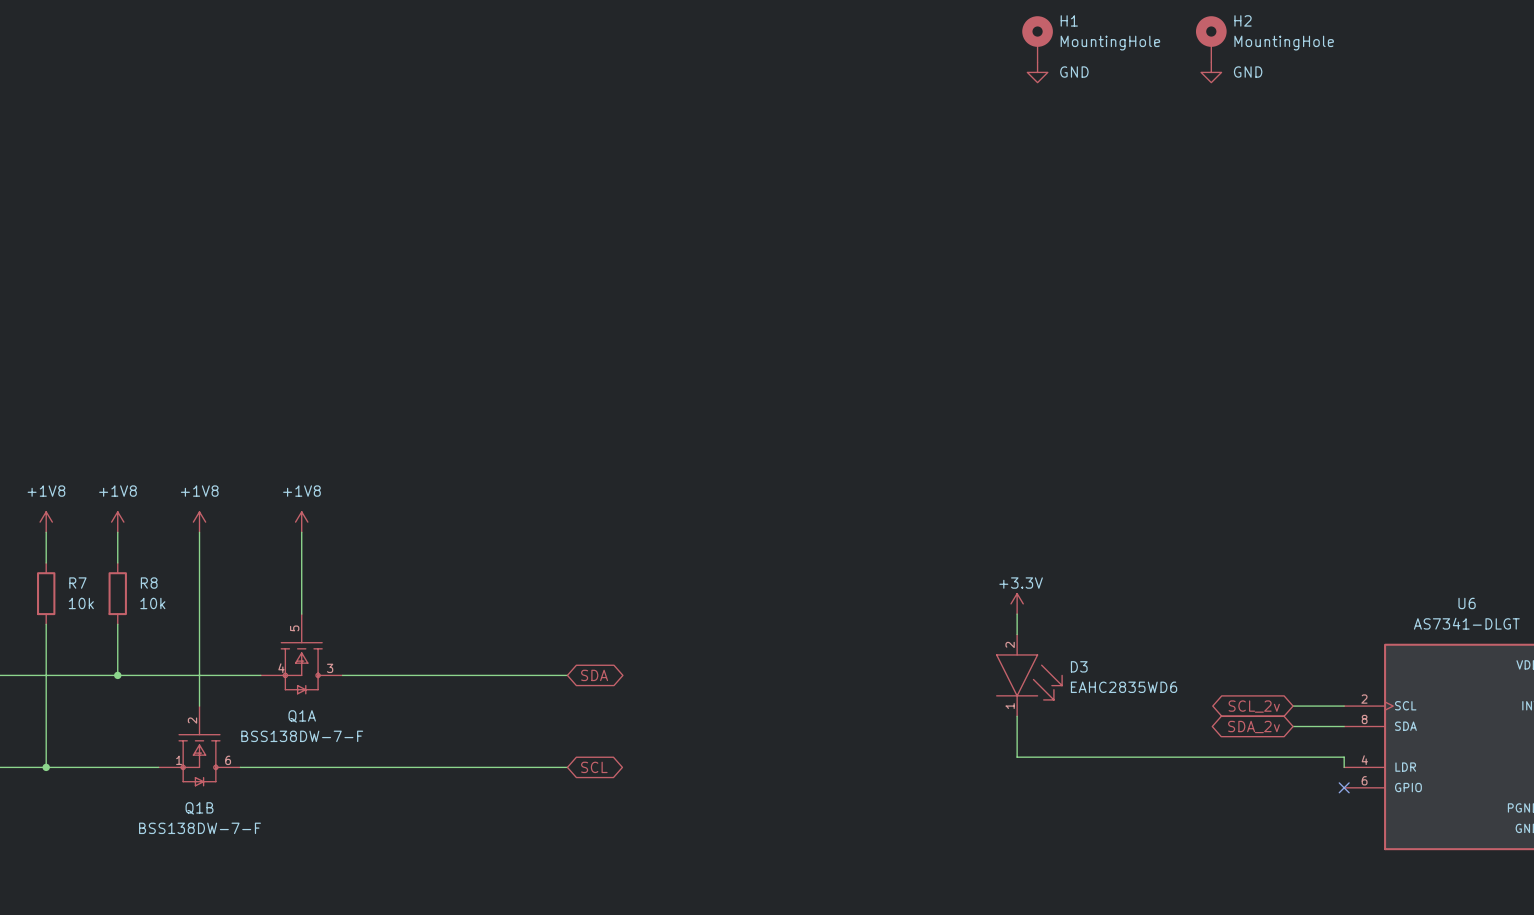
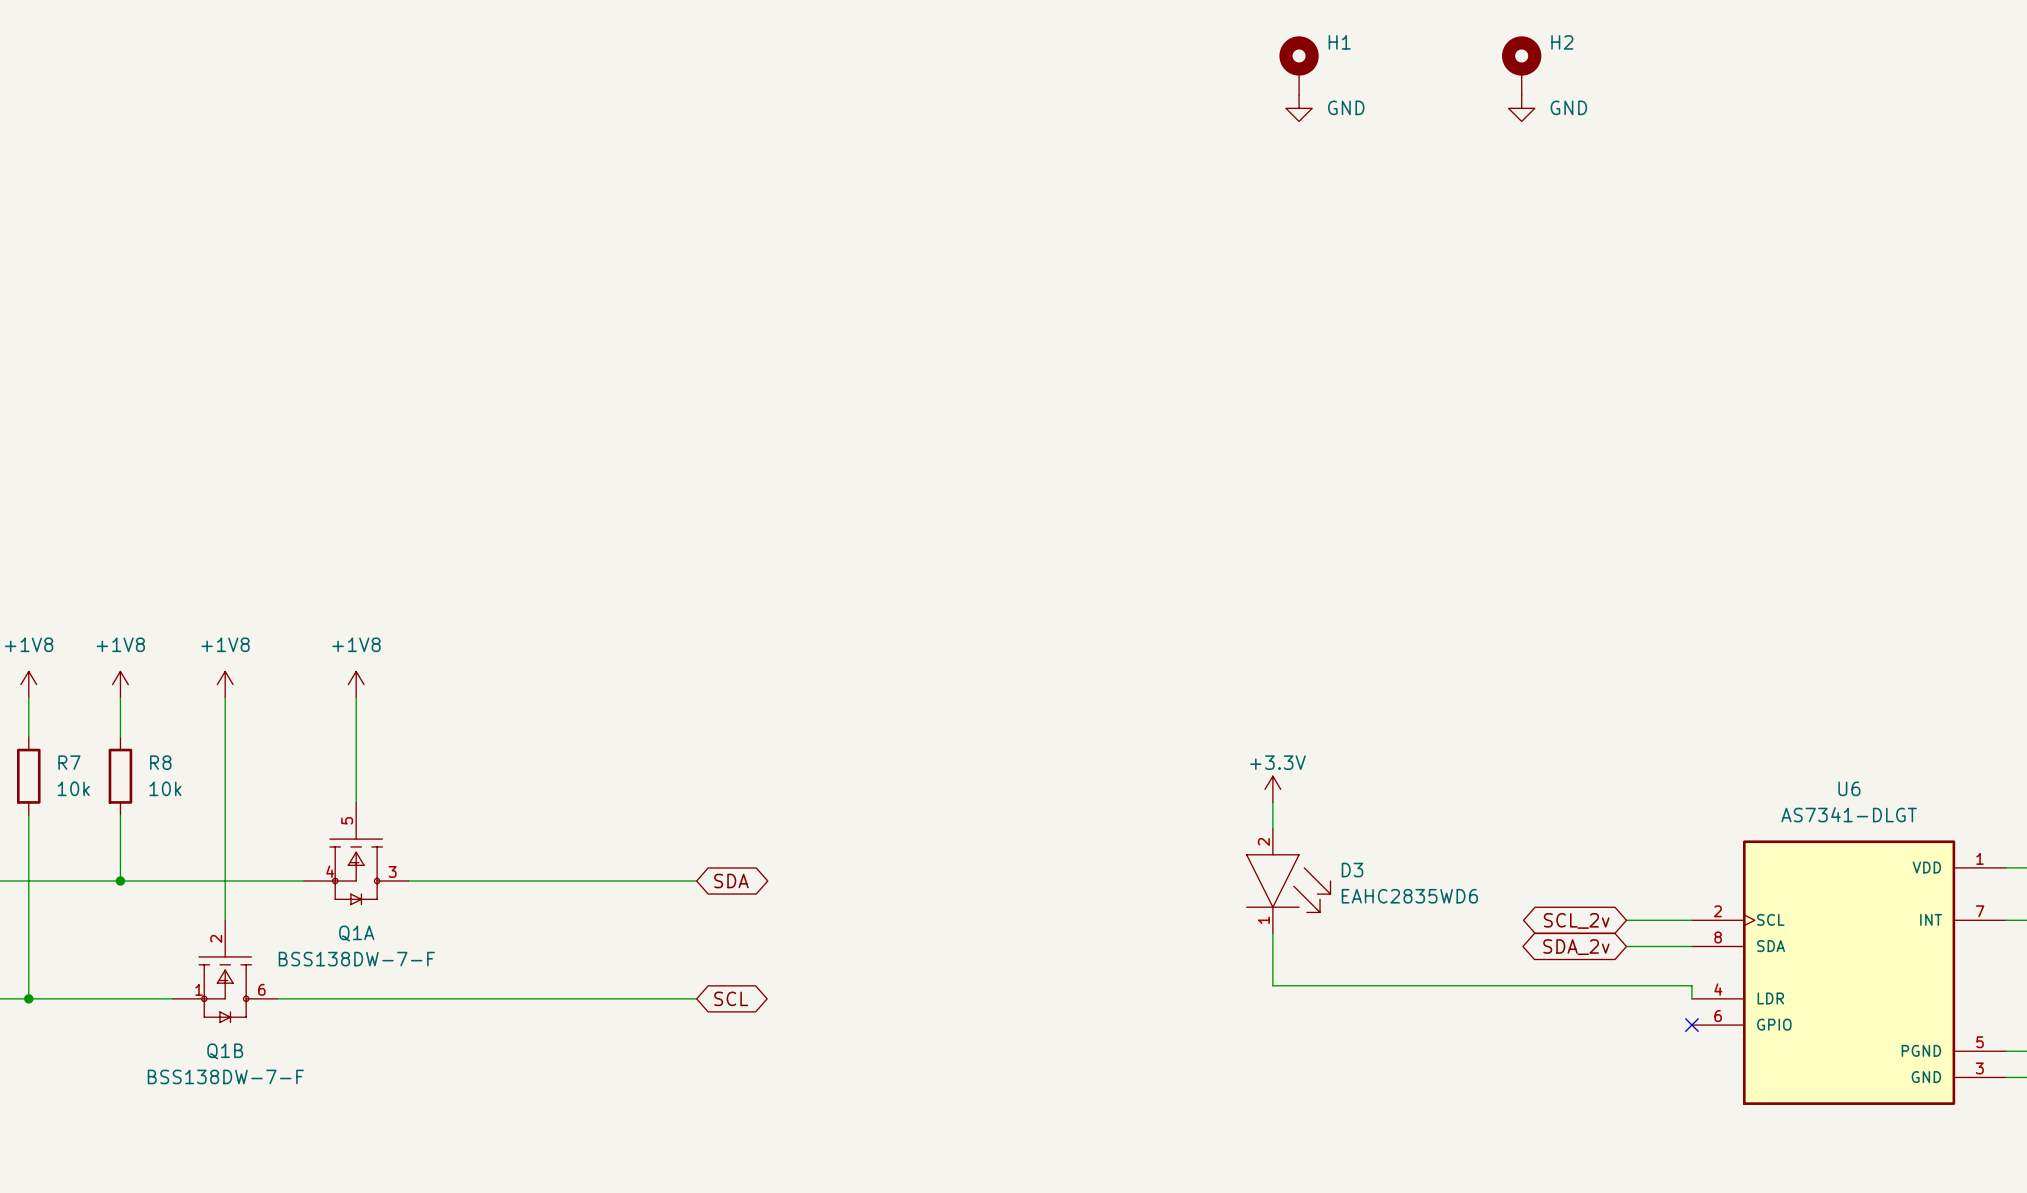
H1 value: MountingHole (1110, 43) -> none
H2 value: MountingHole (1284, 43) -> none

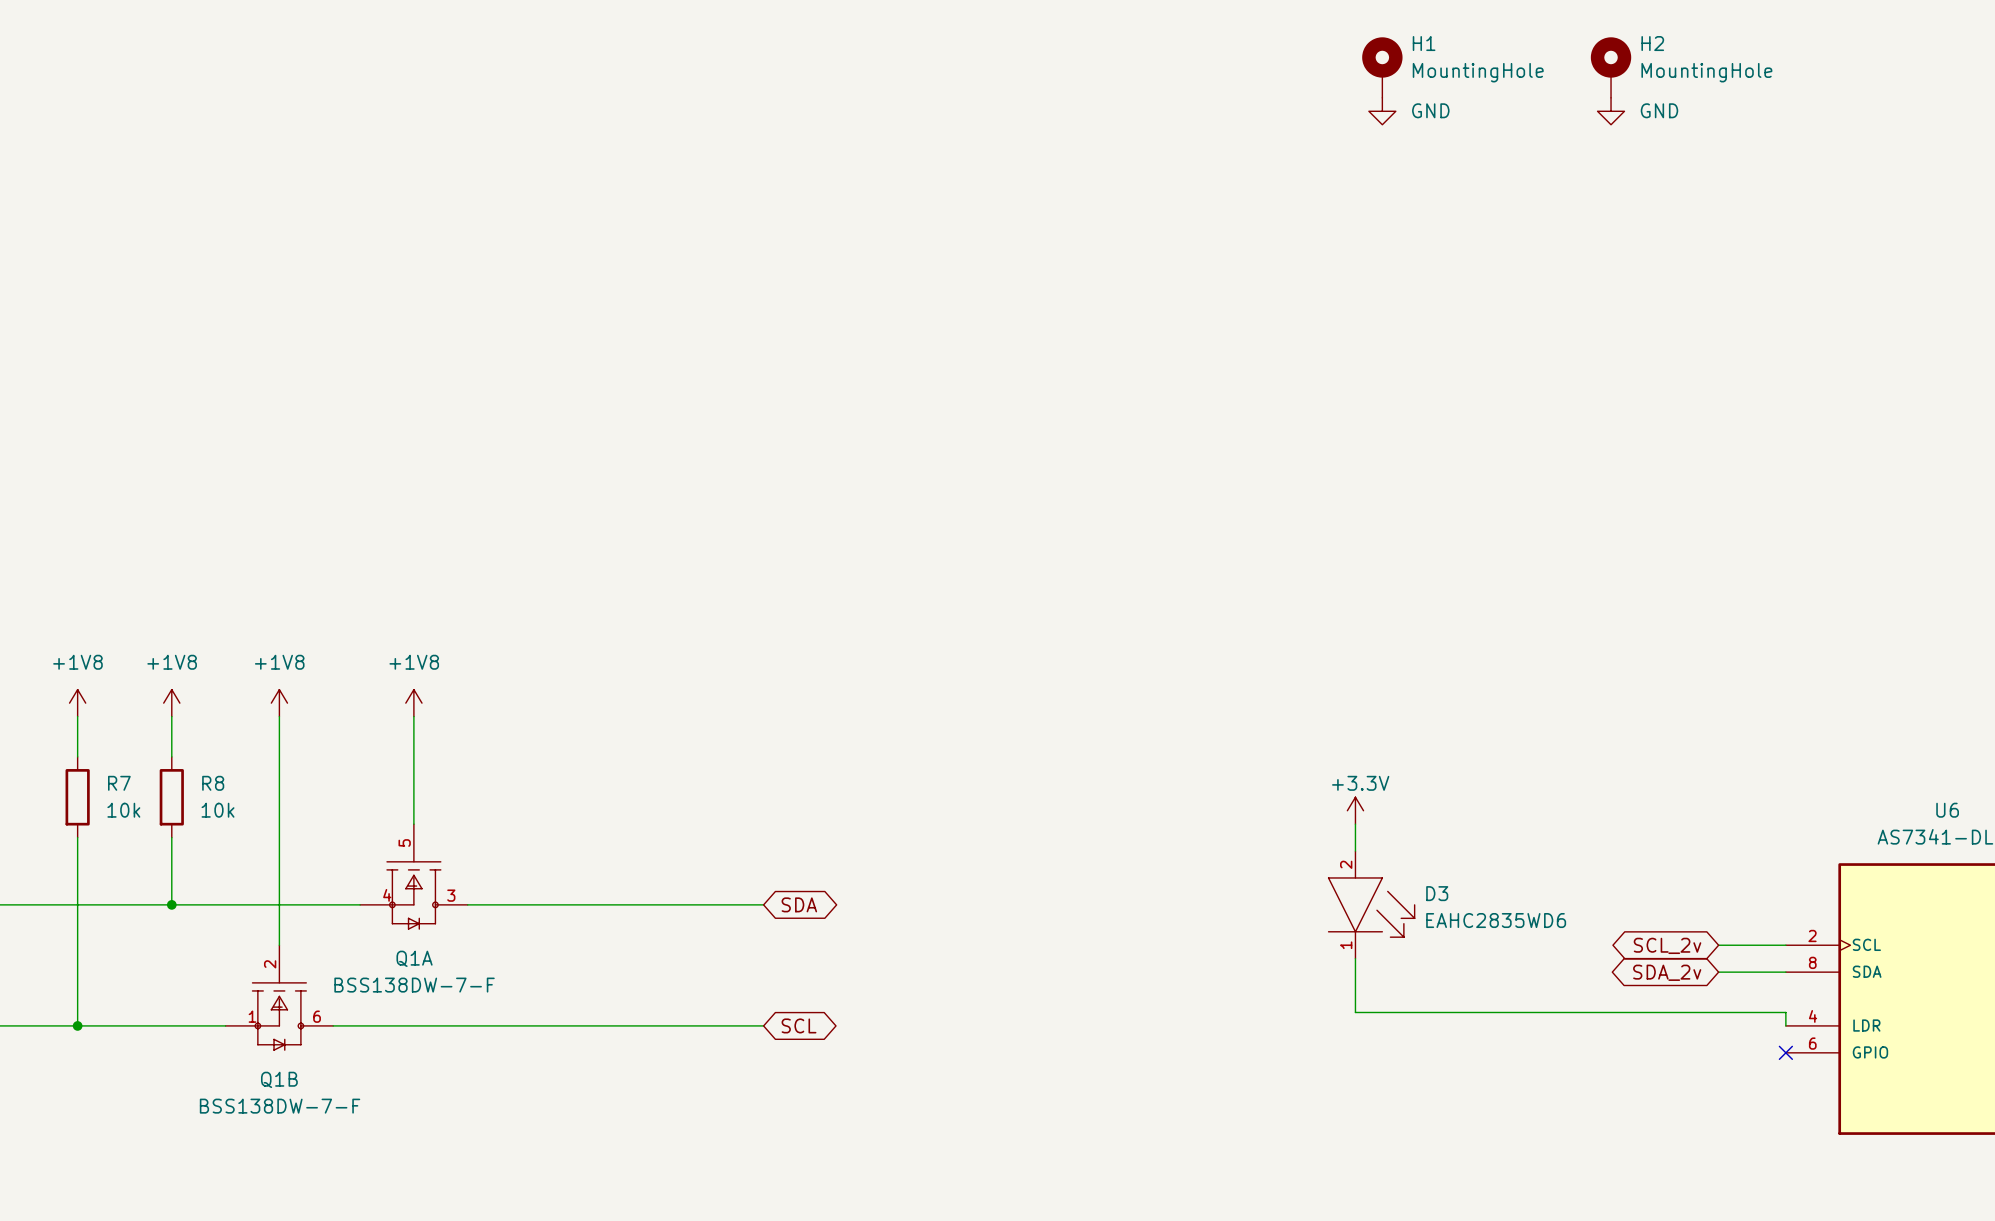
H1 value: none -> MountingHole (1478, 72)
H2 value: none -> MountingHole (1706, 72)

